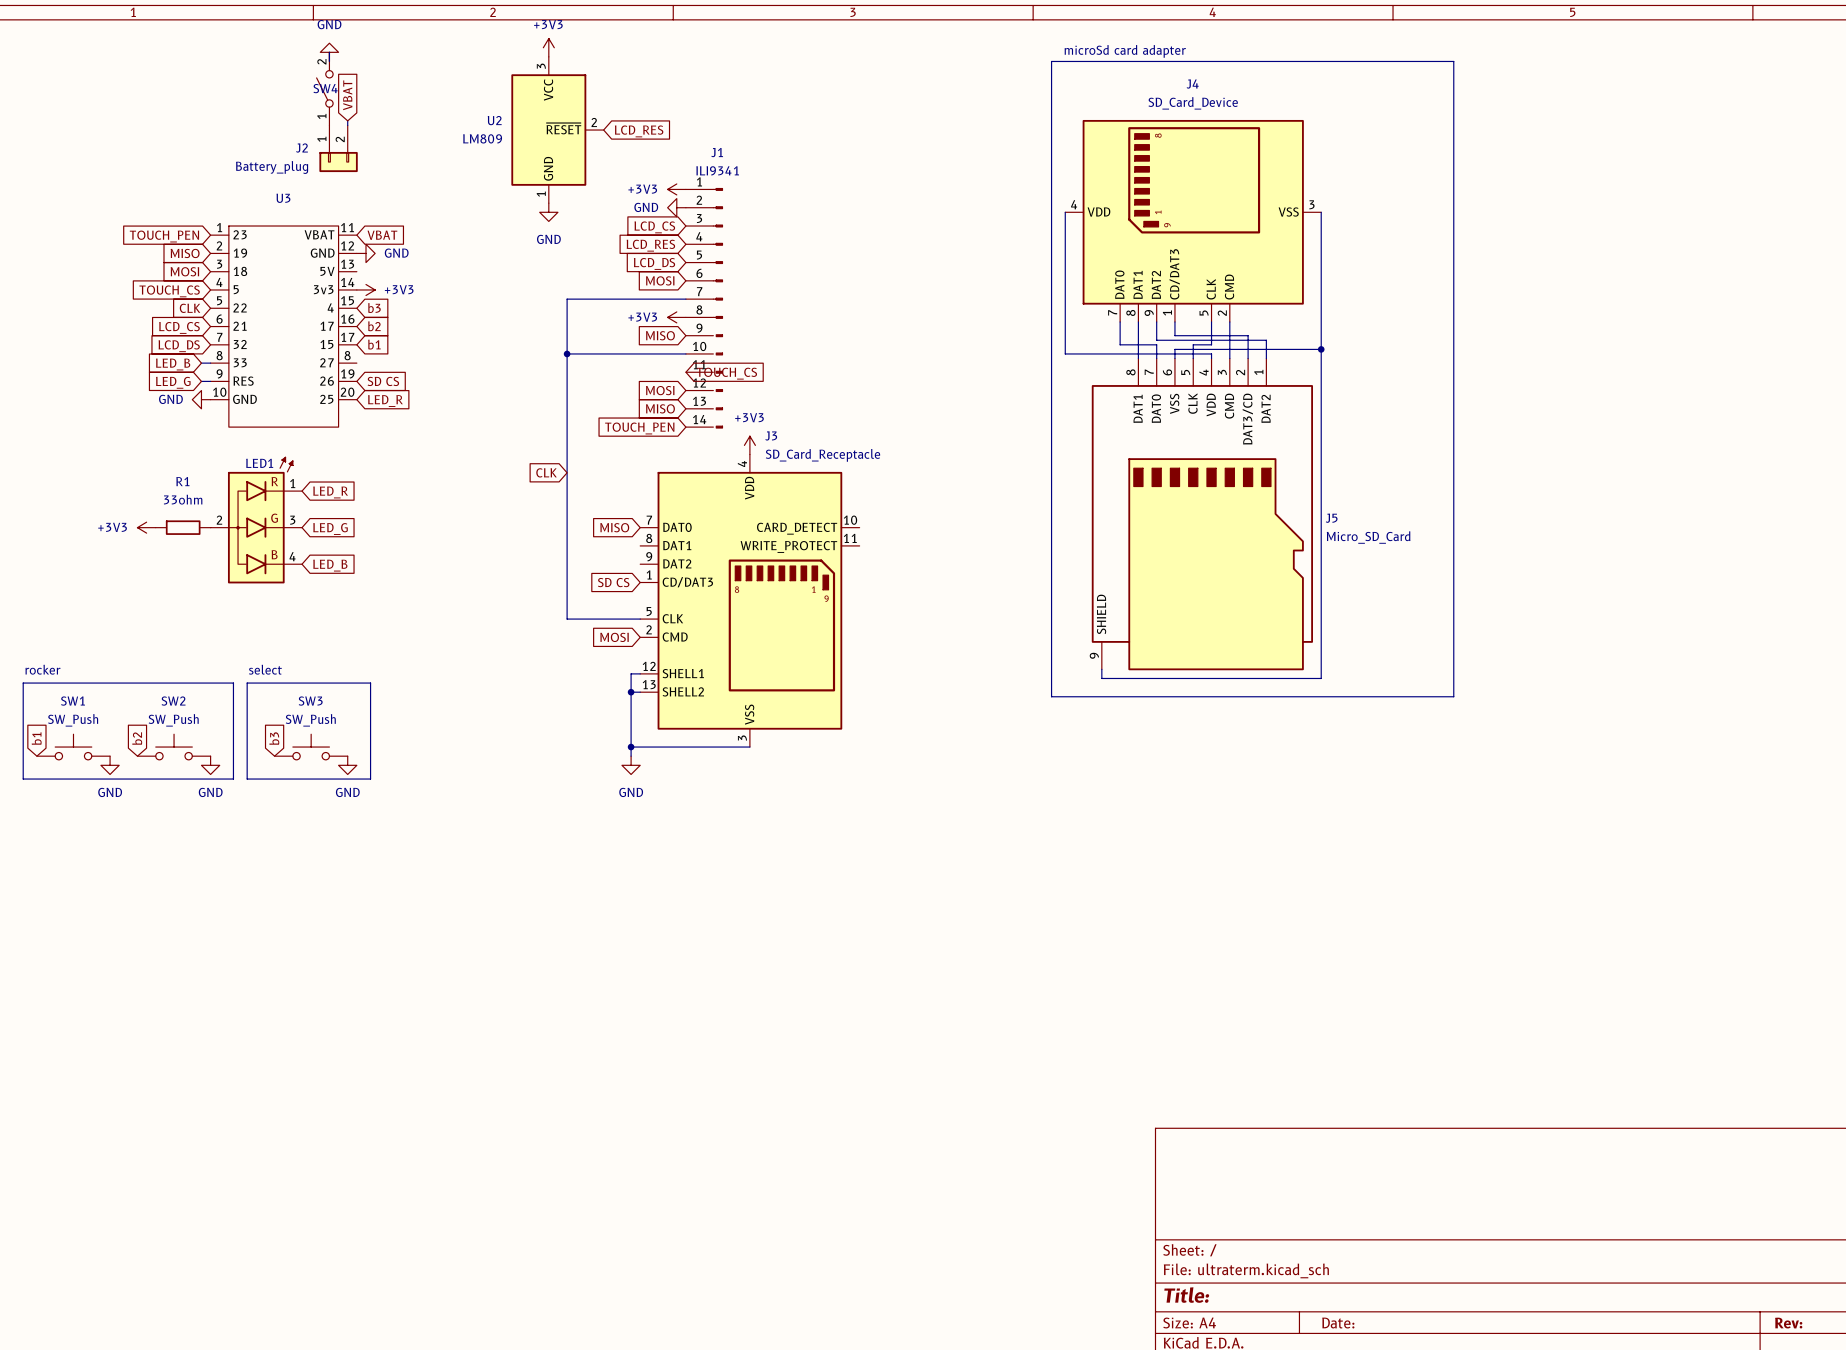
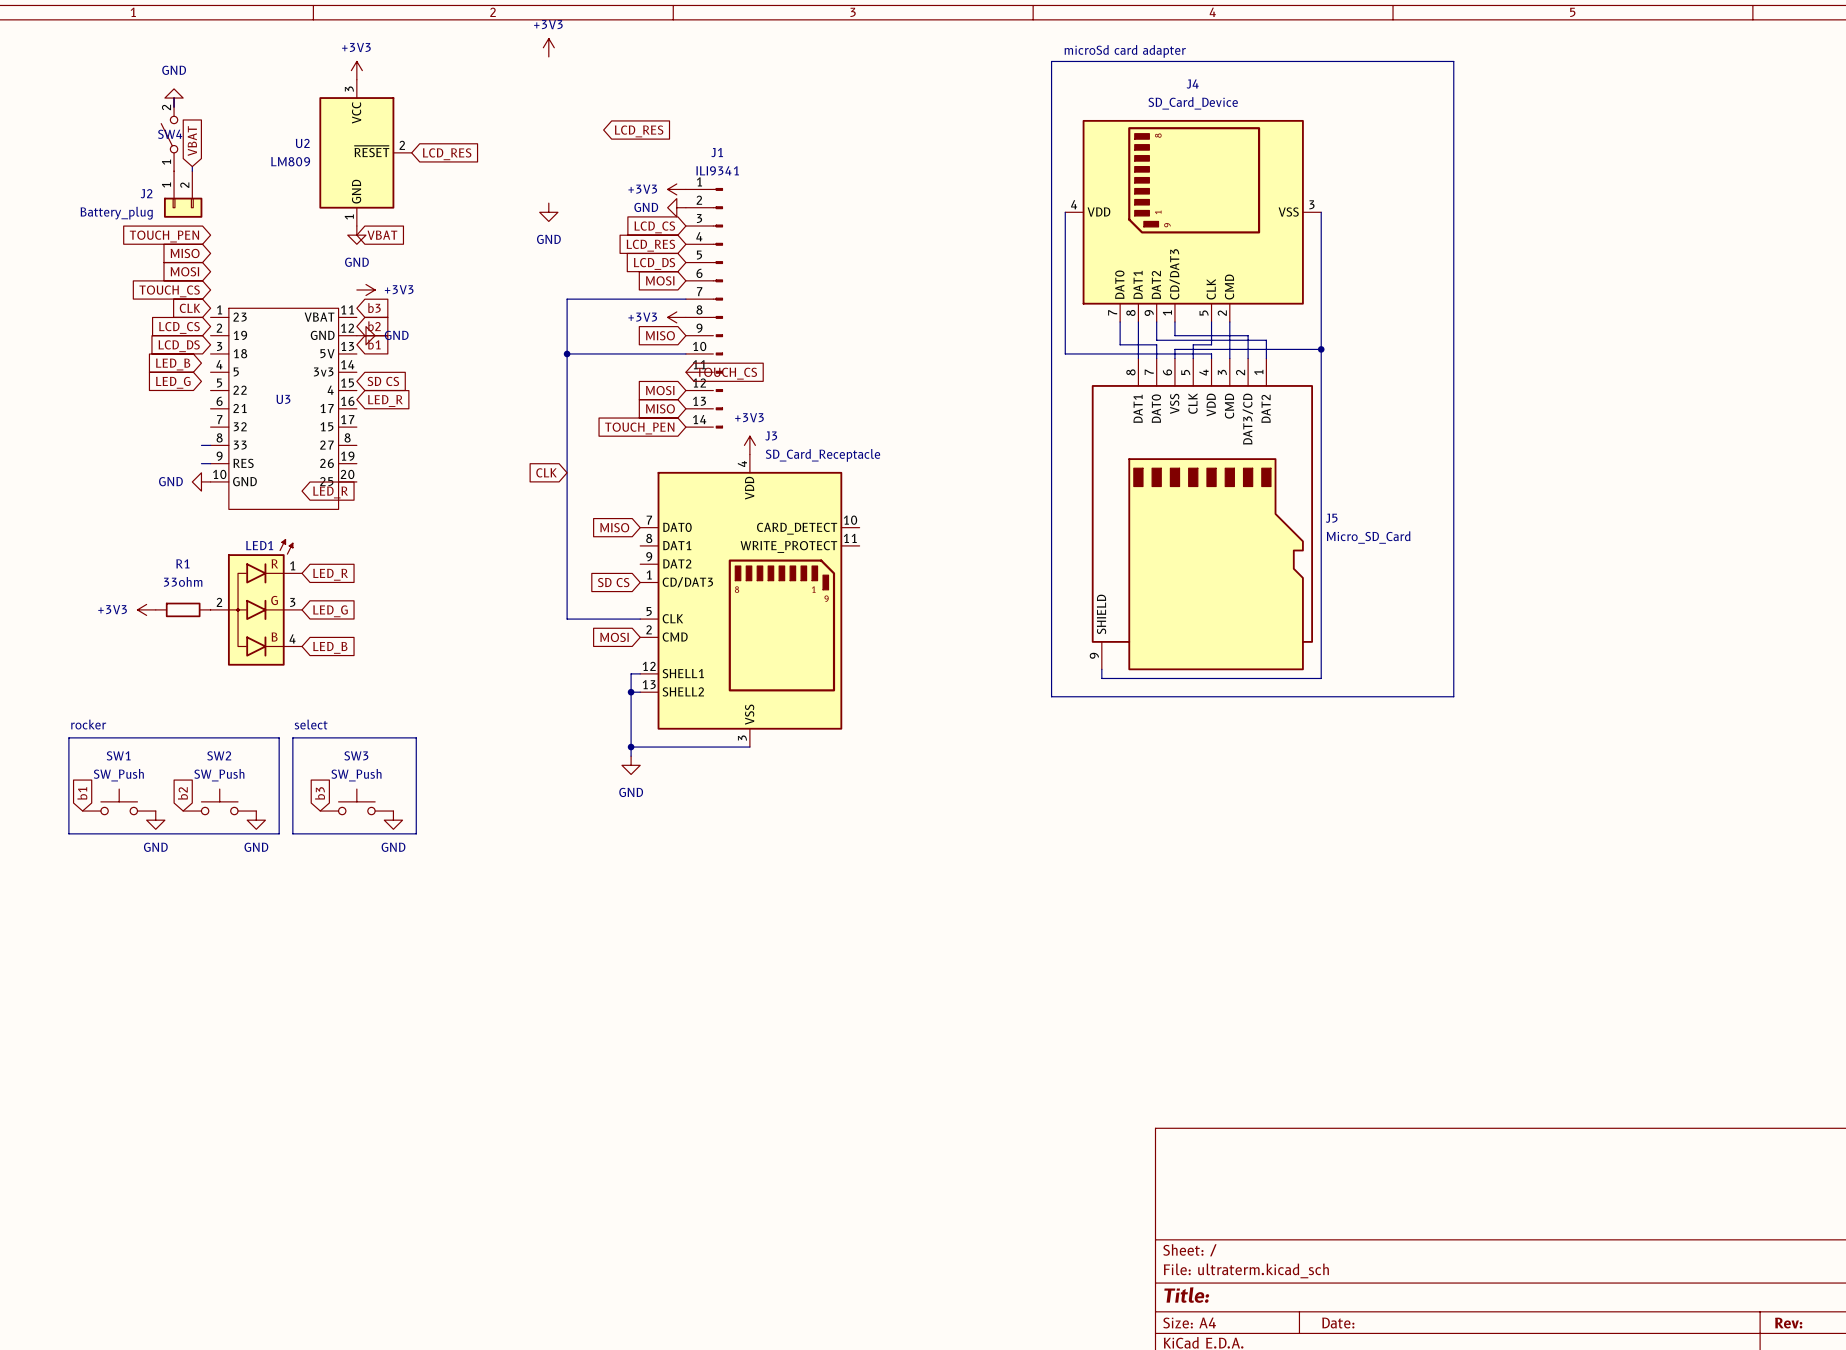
wire: (329, 52) (329, 61) -> (174, 98) (174, 107)
power symbol: GND (329, 52) -> none
power symbol: none -> +3V3 (356, 70)
SW4 position: (324, 88) -> (169, 134)
global label position: VBAT (347, 95) -> VBAT (192, 141)
power symbol: none -> GND (174, 98)
U2 position: (557, 130) -> (365, 152)
J2 position: (338, 148) -> (183, 194)
global label: none -> LCD_RES (447, 154)
U3 name position: U3 (283, 198) -> U3 (283, 399)
power symbol rotation: 0° (365, 253) -> 90° clockwise (356, 235)
power symbol position: GND (365, 253) -> GND (356, 235)
U3 position: (283, 326) -> (283, 408)
power symbol: none -> GND (365, 335)
wire: (201, 363) (210, 363) -> (201, 445) (210, 445)
wire: (201, 381) (210, 381) -> (201, 463) (210, 463)
power symbol position: GND (201, 399) -> GND (201, 481)
LED1 position: (256, 520) -> (256, 602)
power symbol position: +3V3 (146, 527) -> +3V3 (146, 609)
R1 position: (183, 527) -> (183, 609)
global label position: LED_G (330, 529) -> LED_G (330, 611)
global label position: LED_B (330, 565) -> LED_B (330, 647)
global label: none -> LED_R (330, 574)
text position: rocker (43, 669) -> rocker (88, 724)
text position: select (265, 669) -> select (311, 724)
line: (23, 683) (233, 683) (233, 779) (23, 779) (23, 683) -> (68, 737) (279, 737) (279, 833) (68, 833) (68, 737)
line: (247, 683) (370, 683) (370, 779) (247, 779) (247, 683) -> (292, 737) (416, 737) (416, 833) (292, 833) (292, 737)
global label position: b1 (36, 738) -> b1 (82, 793)
global label position: b2 (137, 738) -> b2 (182, 793)
global label position: b3 (274, 738) -> b3 (320, 793)
SW1 position: (73, 747) -> (119, 801)
SW2 position: (174, 747) -> (219, 801)
SW3 position: (311, 747) -> (356, 801)
power symbol: GND (110, 765) -> none
power symbol: GND (210, 765) -> none
power symbol: GND (347, 765) -> none
power symbol: none -> GND (155, 820)
power symbol: none -> GND (256, 820)
power symbol: none -> GND (393, 820)

